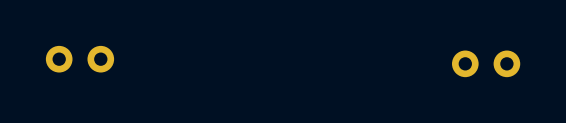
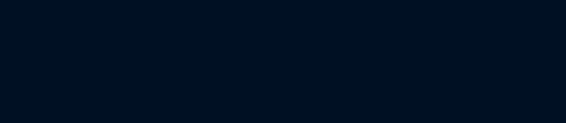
part: (79, 59) -> none
part: (486, 63) -> none

